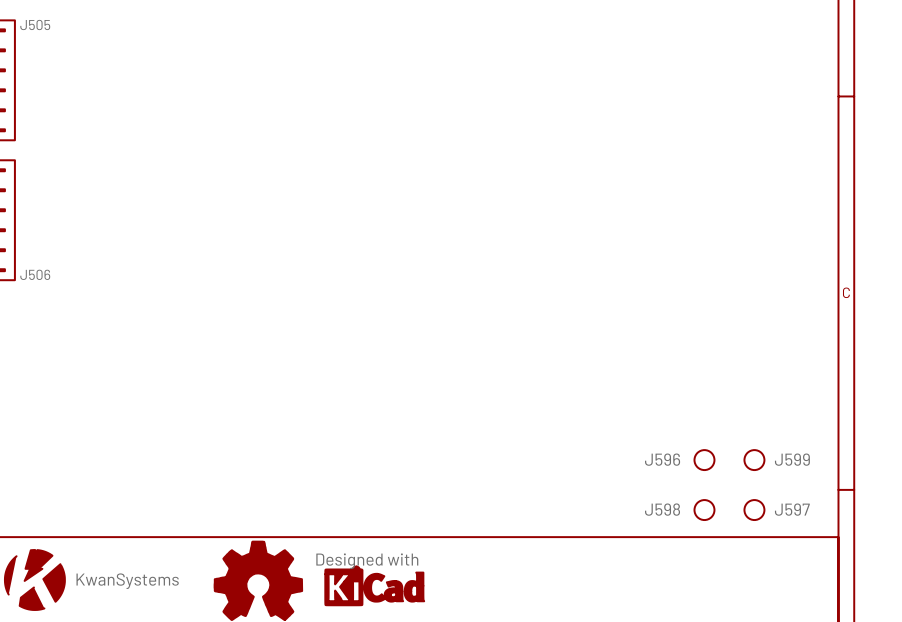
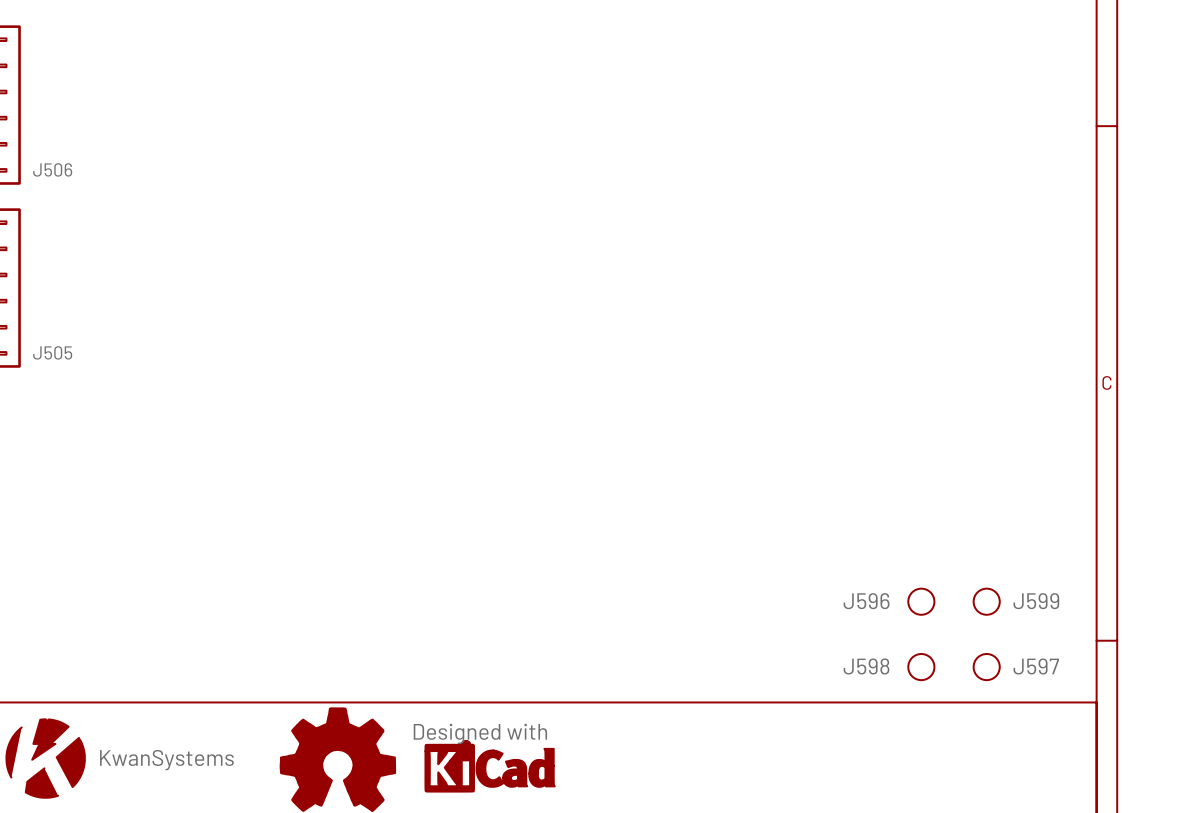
J505 name position: J505 (35, 24) -> J505 (52, 352)
J506 name position: J506 (35, 274) -> J506 (52, 169)

